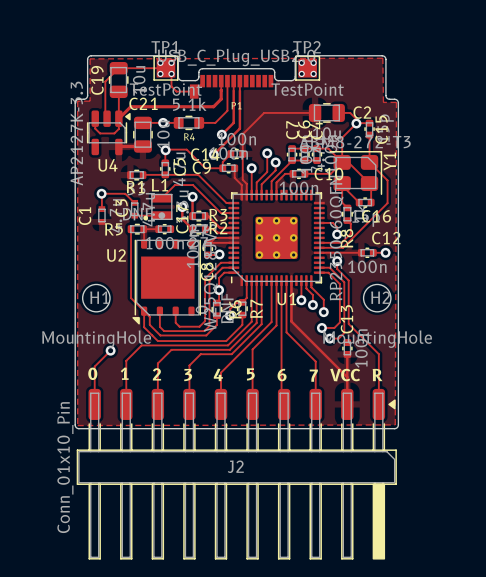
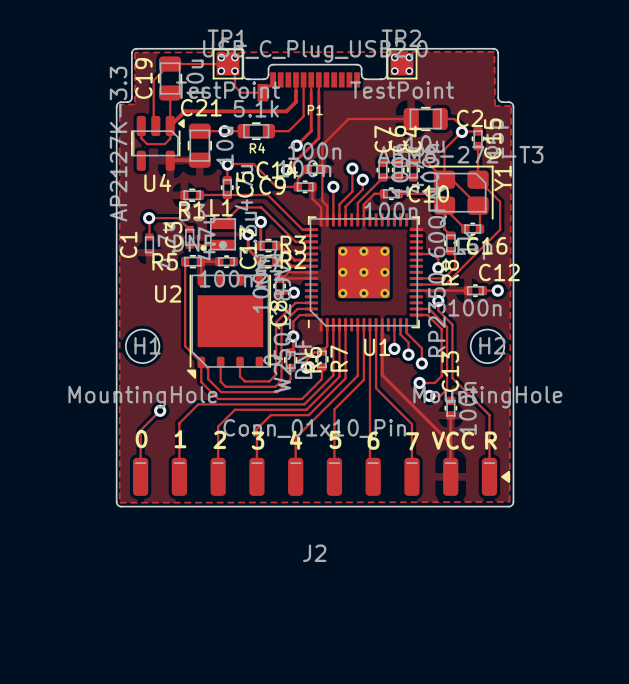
J2 footprint: [76, 388, 397, 560] -> [132, 457, 511, 496]
J2 value position: Conn_01x10_Pin (65, 467) -> Conn_01x10_Pin (314, 428)

